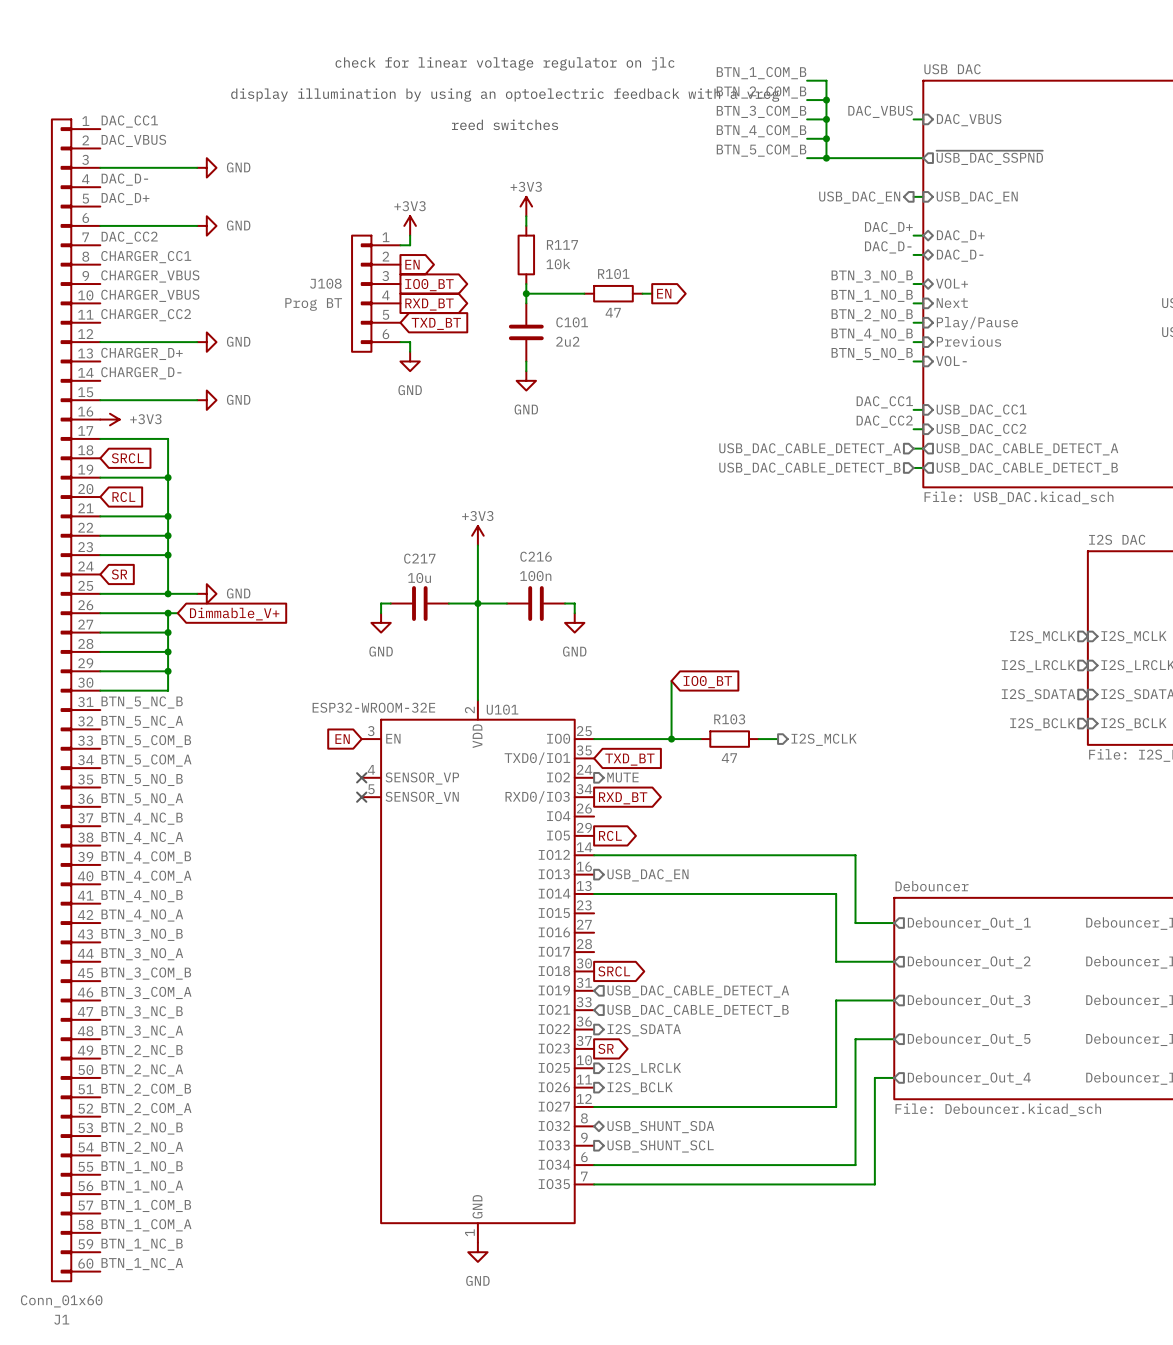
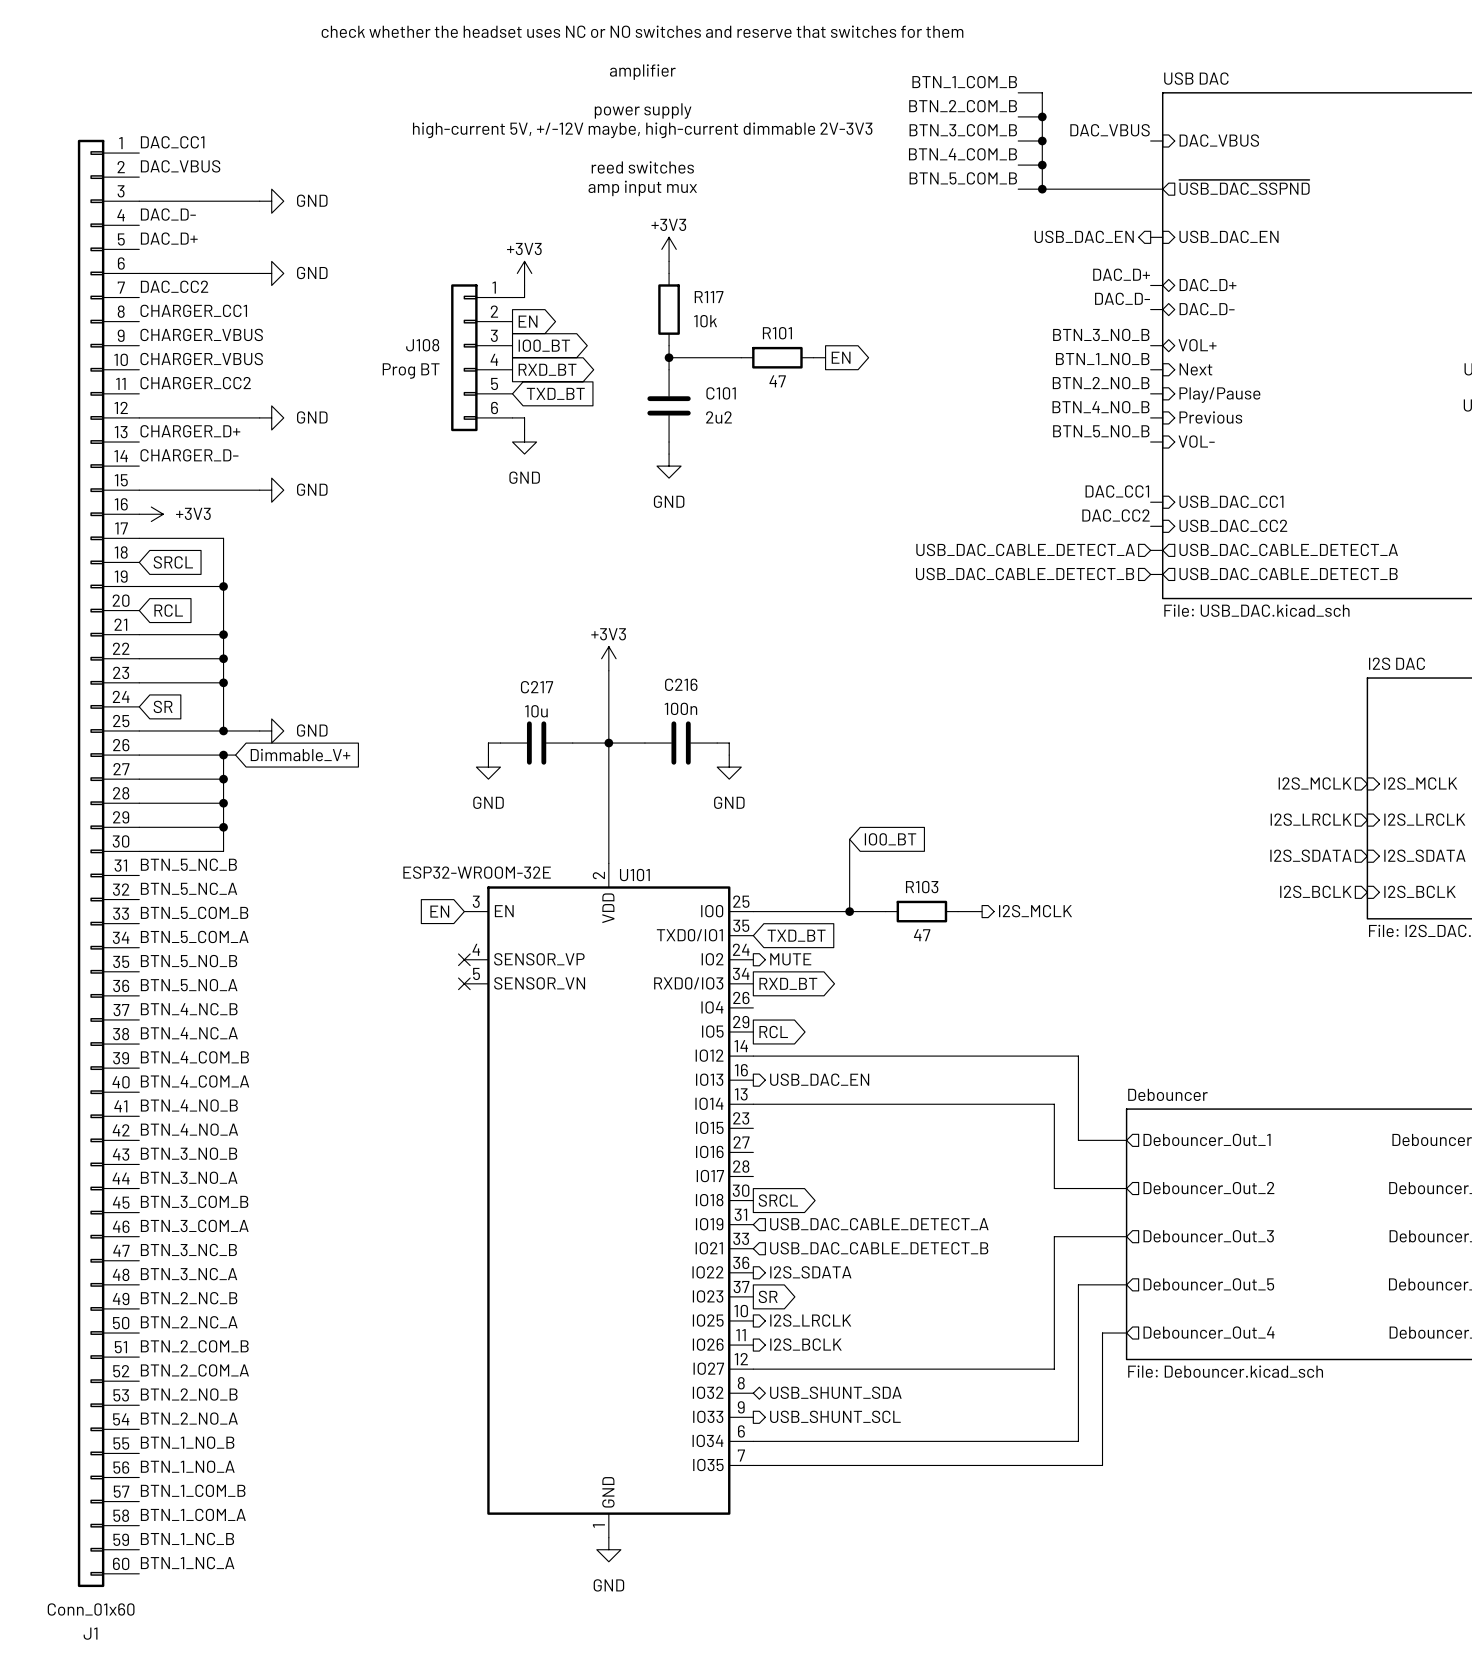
text: none -> check whether the headset uses NC or NO switches and reserve that switches for them (642, 31)
text: check for linear voltage regulator on jlc (505, 63) -> amplifier (642, 72)
text: display illumination by using an optoelectric feedback with a vreg (505, 95) -> power supply (643, 111)
text: none -> high-current 5V, +/-12V maybe, high-current dimmable 2V-3V3 (642, 130)
text position: reed switches (505, 124) -> reed switches (642, 167)
text: none -> amp input mux (642, 188)

